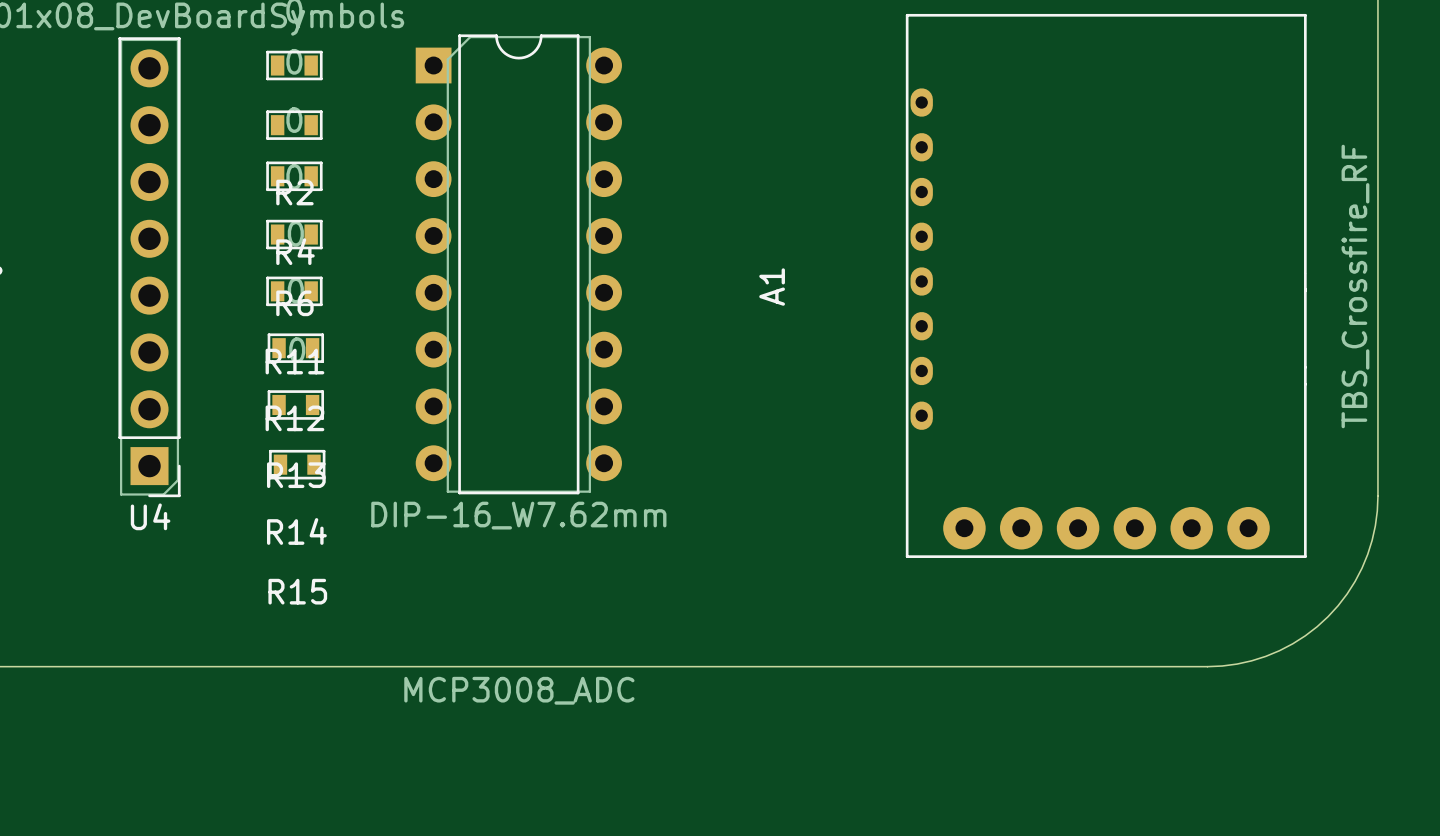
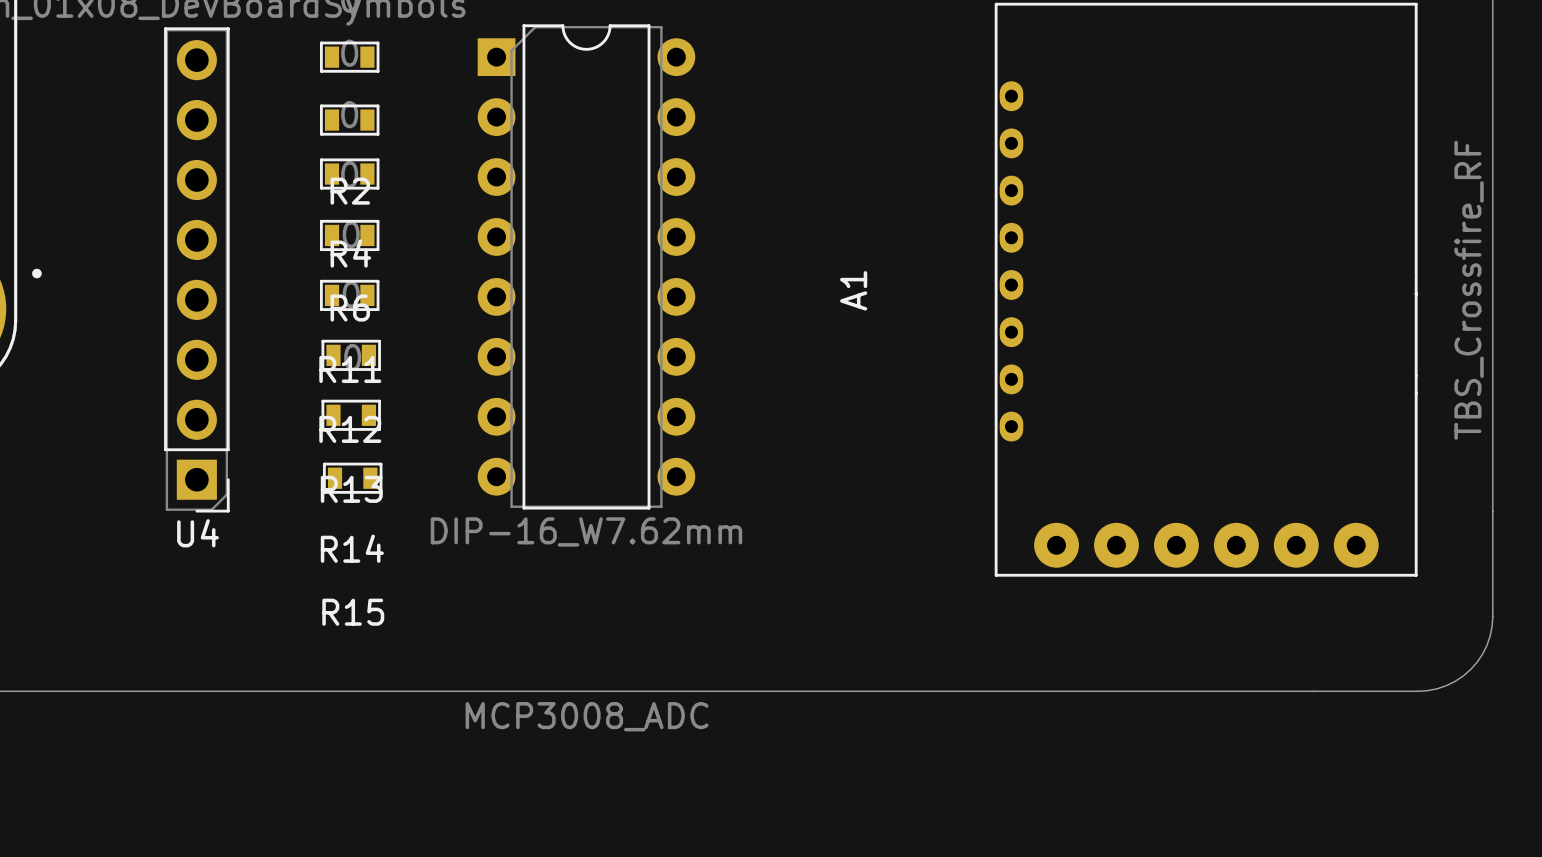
board edge: (1377, 496) (1375, 525) (1367, 554) (1347, 593) (1328, 616) (1305, 635) (1265, 656) (1237, 664) (1207, 666) -> (1492, 511) (1492, 626) (1487, 645) (1470, 669) (1446, 685) (1427, 690) (1312, 691)

